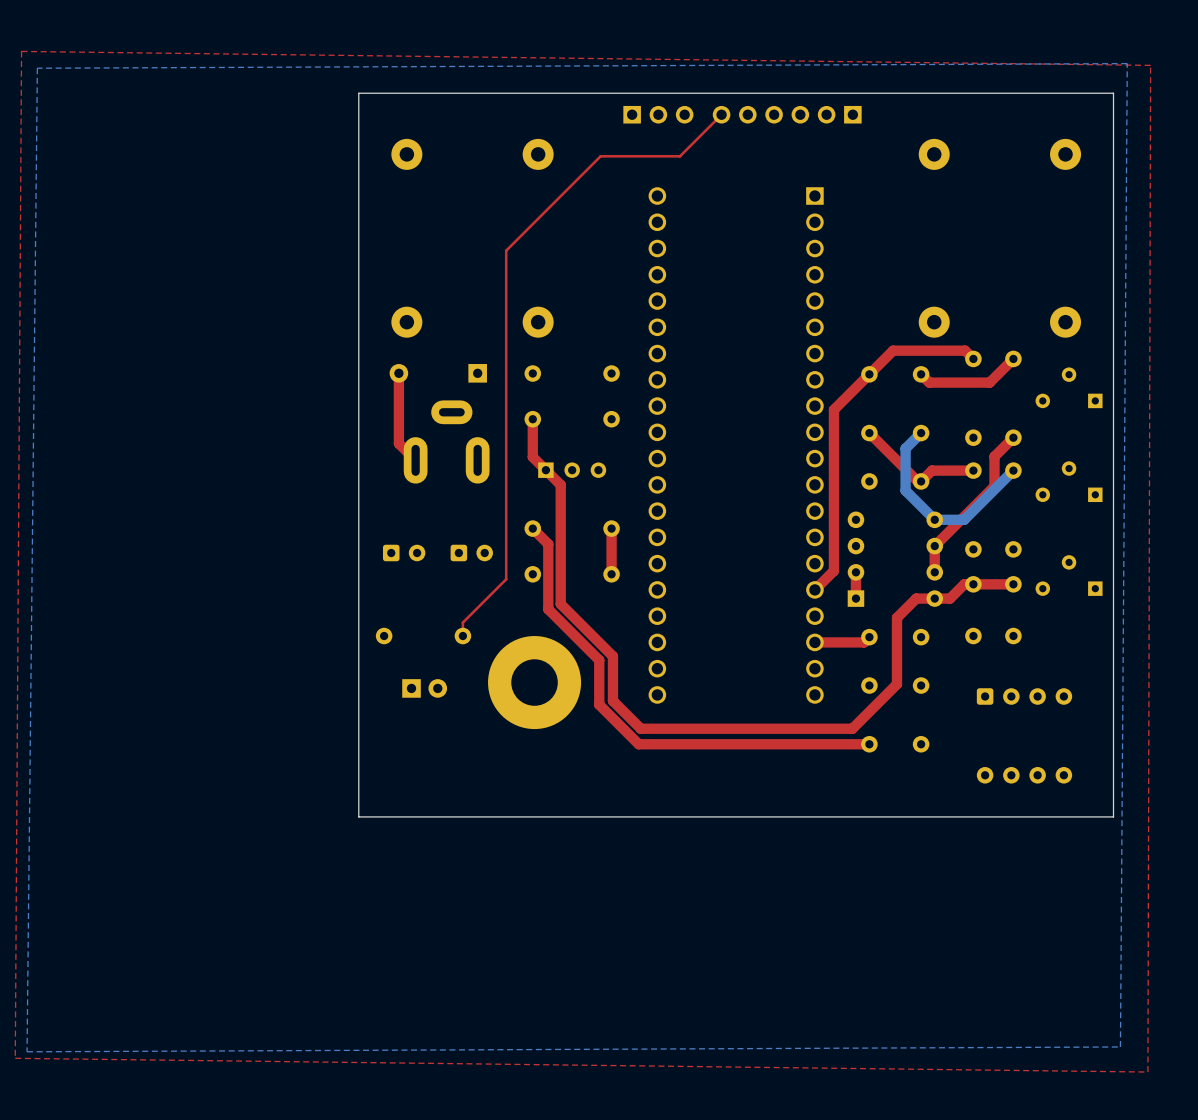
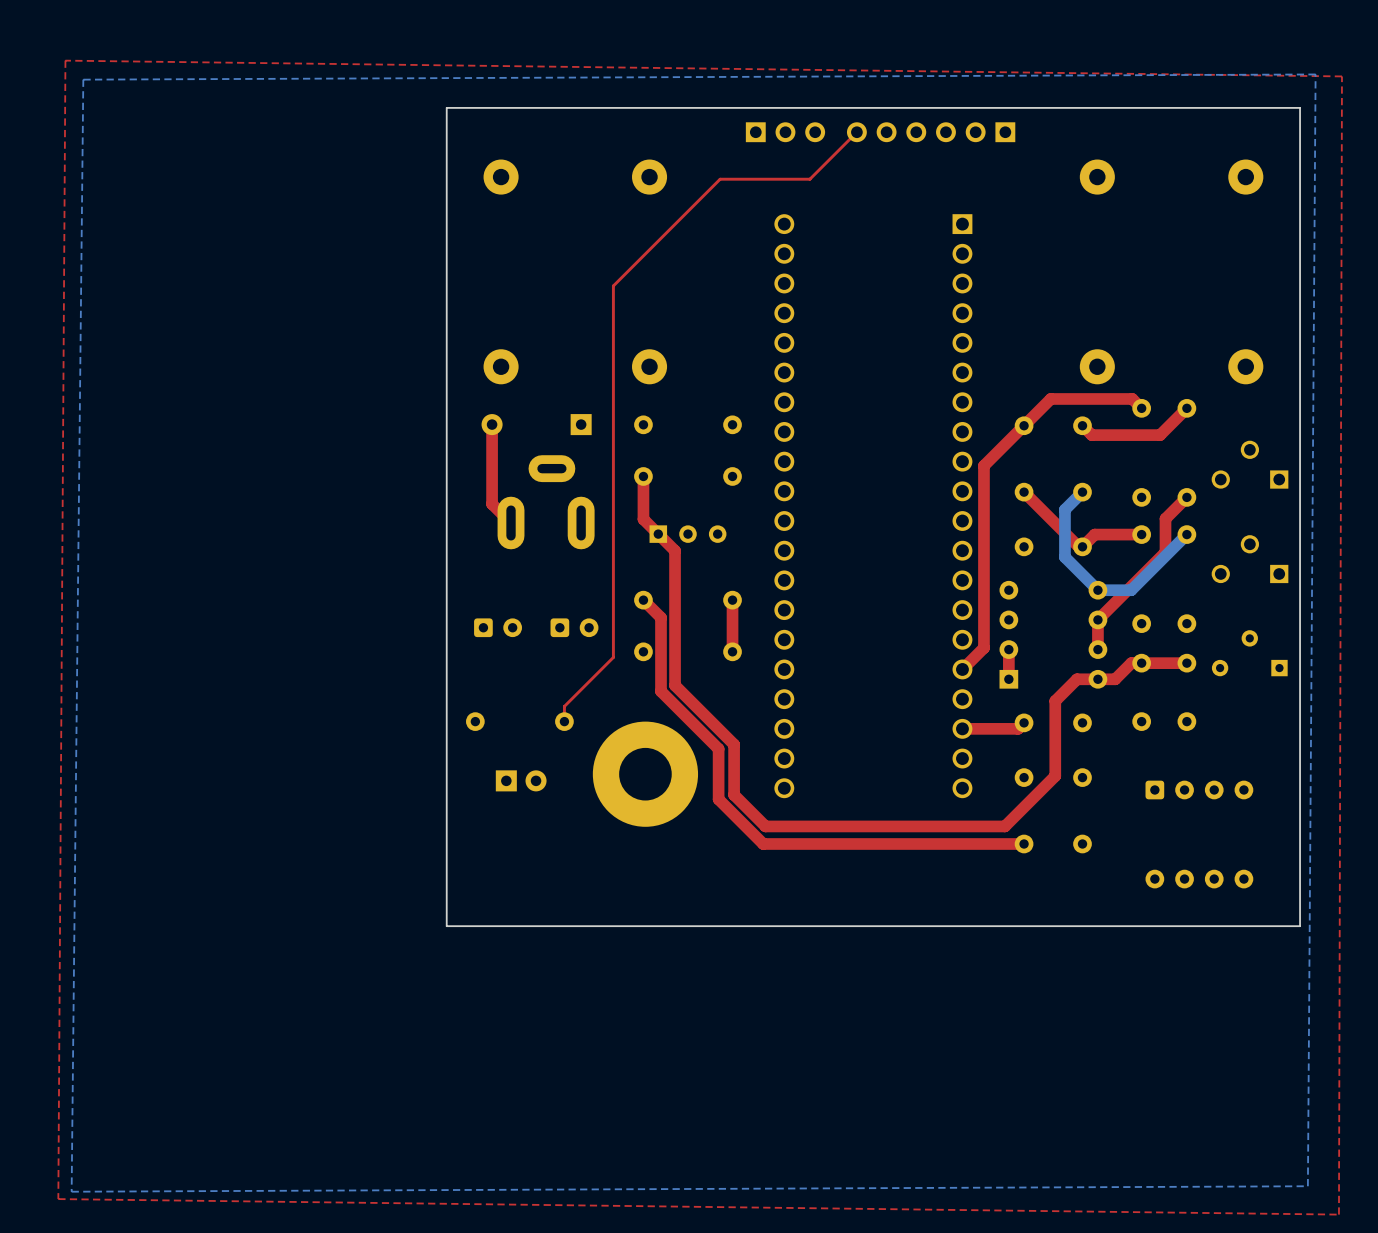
part: (1069, 387) -> none
part: none -> (1250, 464)
part: (1069, 481) -> none
part: none -> (1250, 559)

